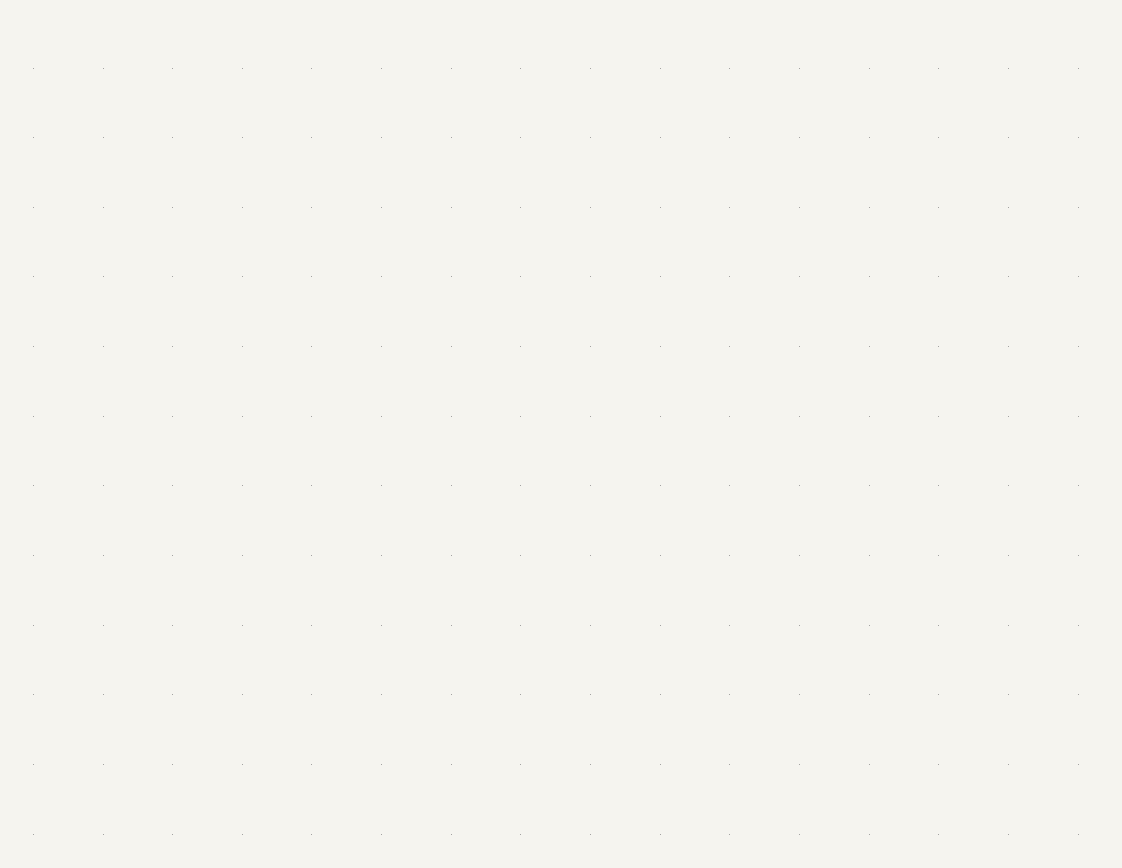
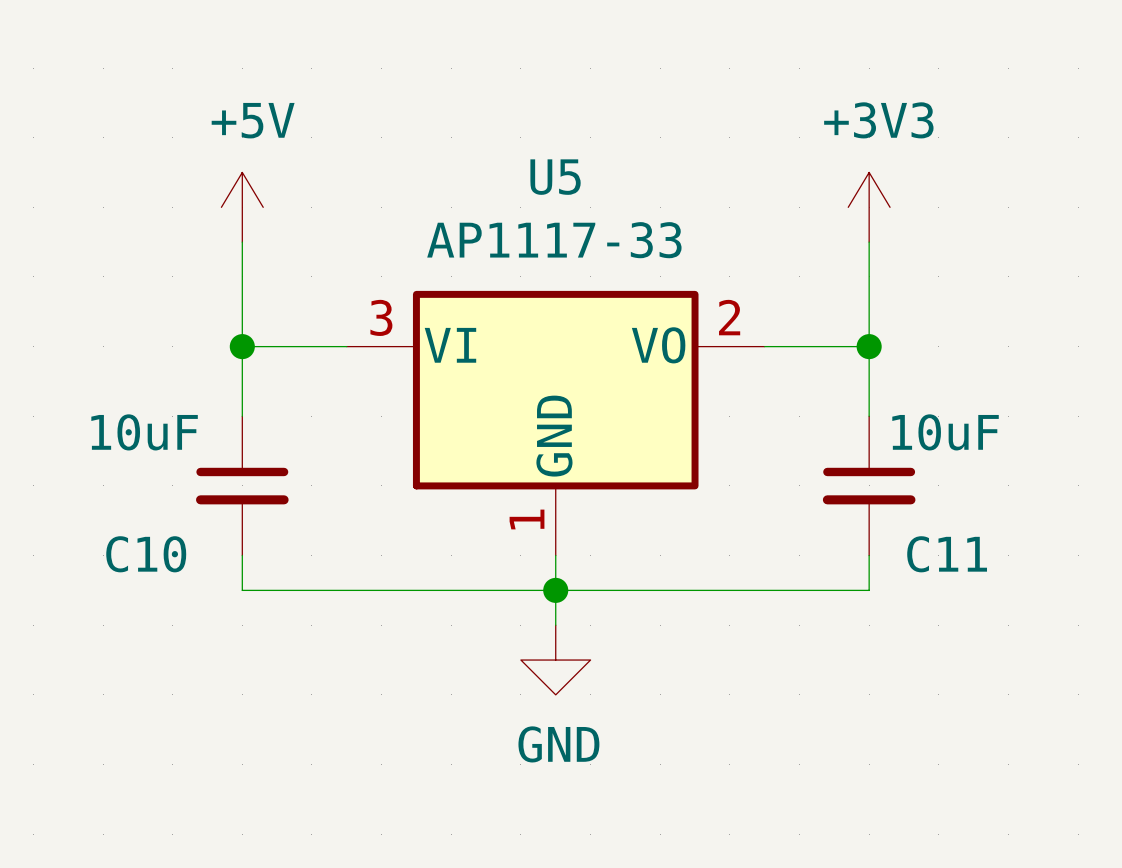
power symbol: none -> +5V (242, 207)
power symbol: none -> +3V3 (869, 207)
wire: none -> (242, 242) (242, 416)
wire: none -> (869, 242) (869, 416)
wire: none -> (242, 346) (346, 346)
junction: none -> (242, 346)
wire: none -> (764, 346) (869, 346)
junction: none -> (869, 346)
U5: none -> AP1117-33 (555, 423)
C10: none -> 10uF (242, 485)
C11: none -> 10uF (869, 485)
wire: none -> (242, 555) (242, 590) (869, 590) (869, 555)
wire: none -> (555, 555) (555, 625)
junction: none -> (555, 590)
power symbol: none -> GND (555, 660)

